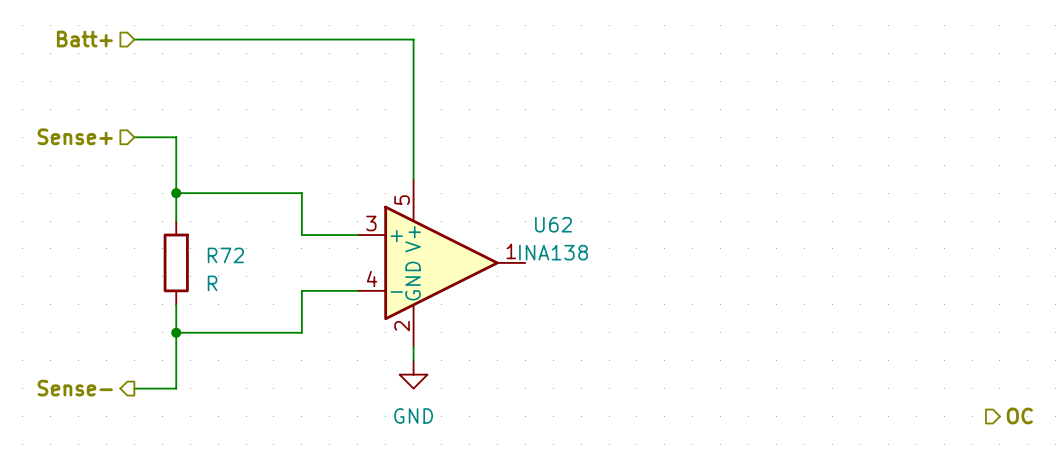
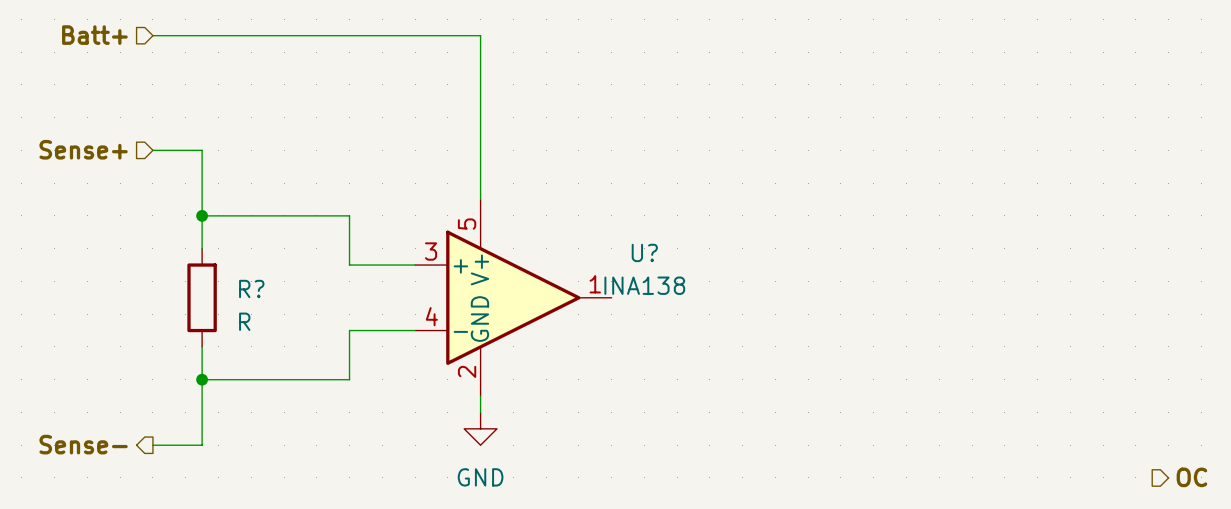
U62 name: U62 (553, 224) -> U? (644, 252)
R72 name: R72 (225, 255) -> R? (251, 288)

